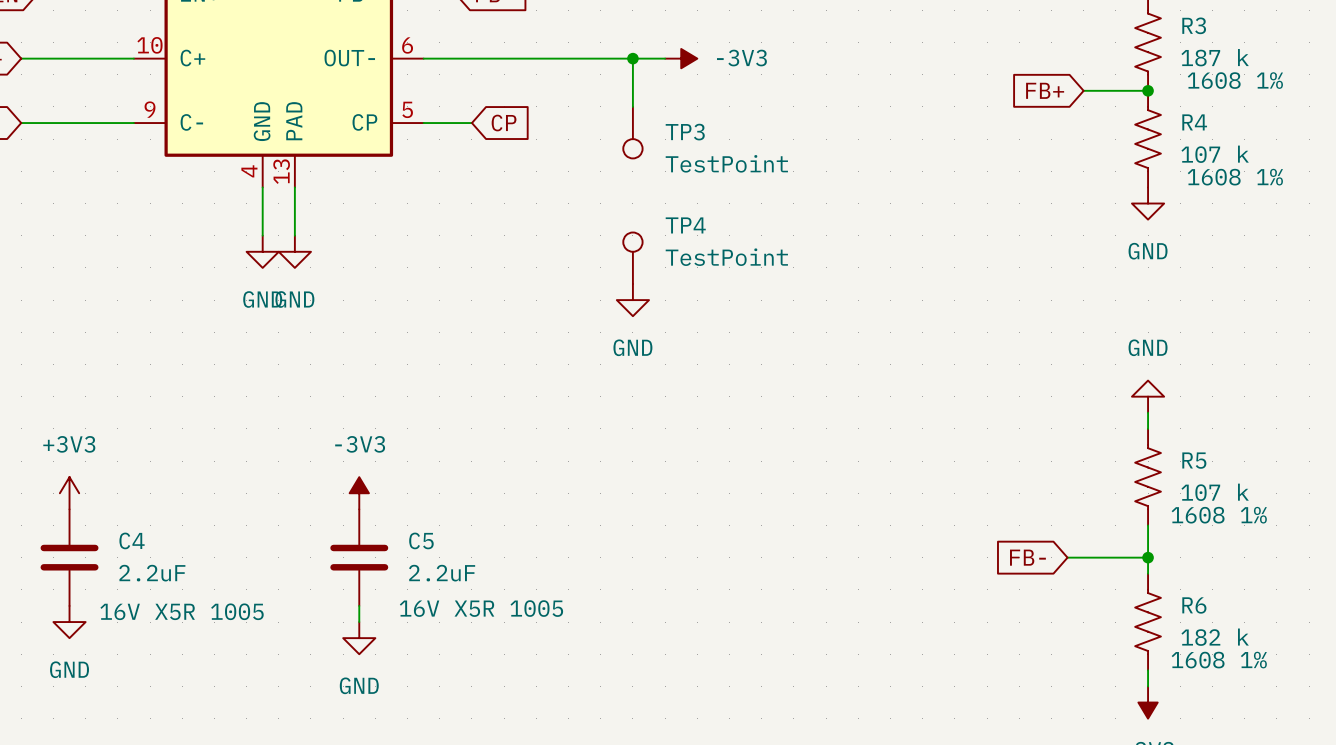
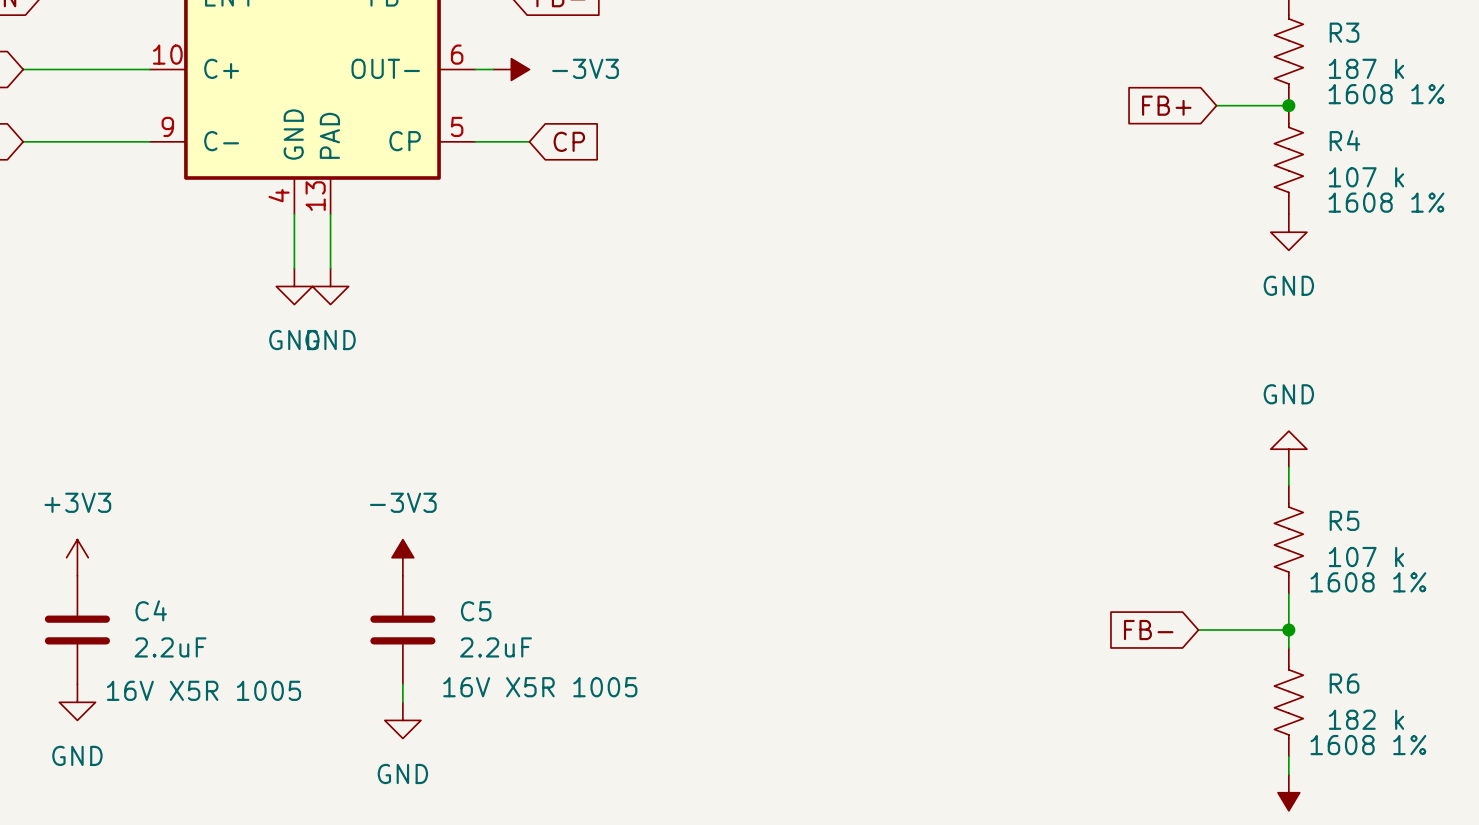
wire: (439, 58) (665, 58) -> none
wire: (632, 58) (632, 106) -> none
junction: (632, 58) -> none
power symbol position: -3V3 (681, 58) -> -3V3 (511, 69)
TP3: TestPoint (632, 132) -> none
TP4: TestPoint (632, 258) -> none
power symbol: GND (632, 300) -> none

